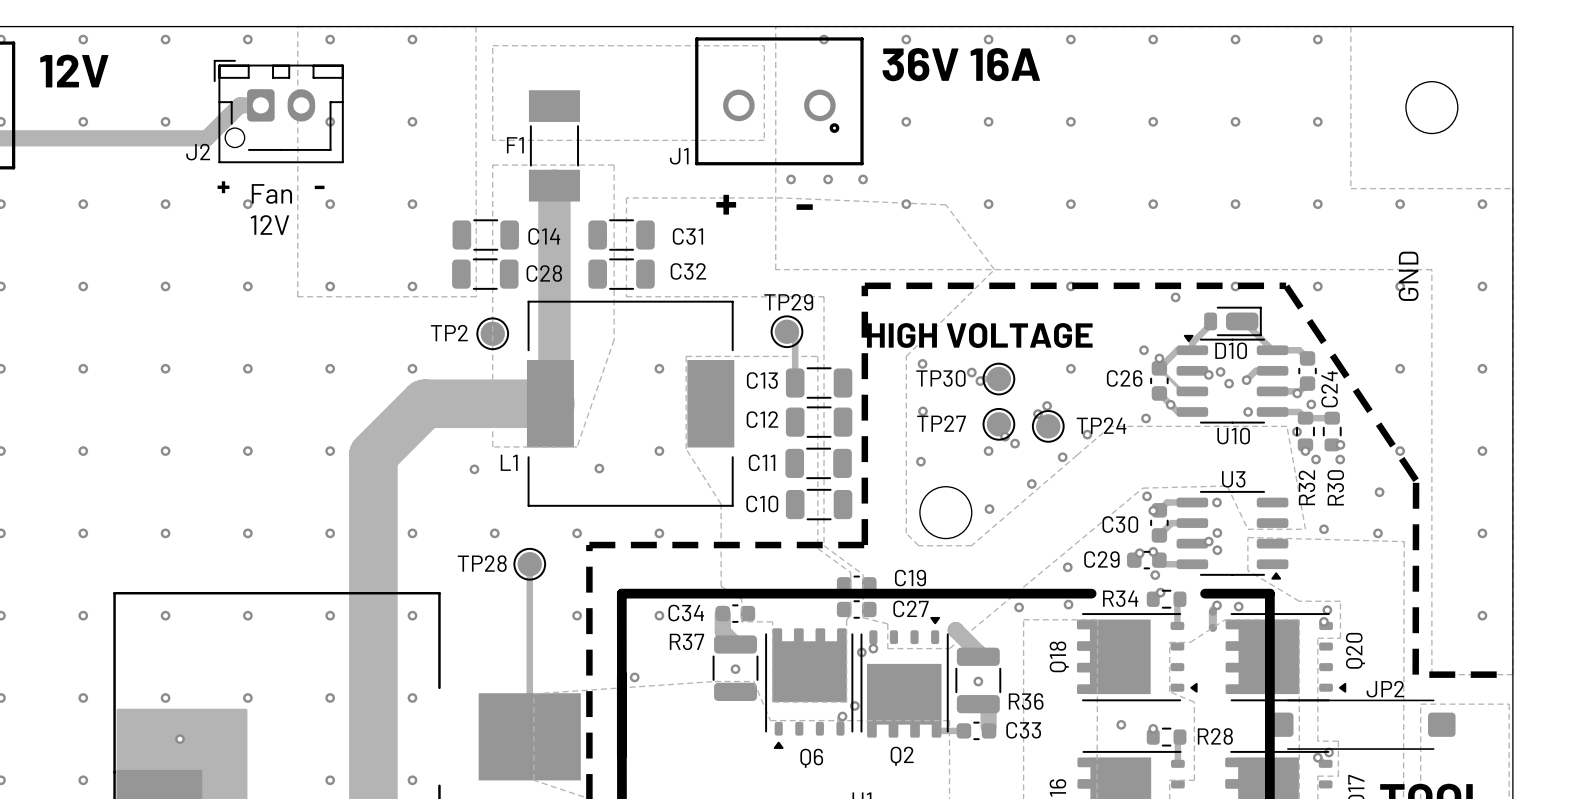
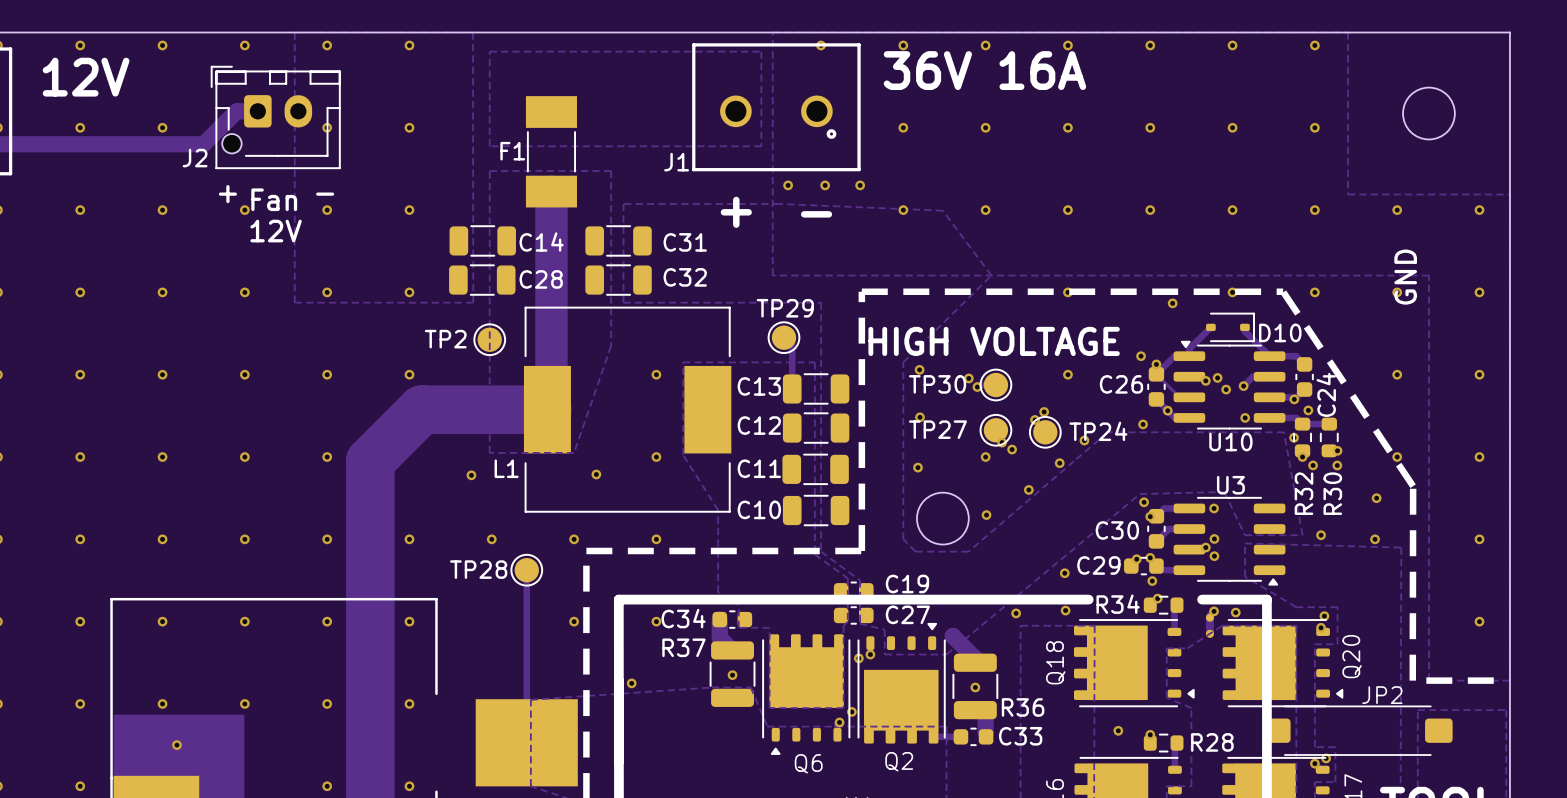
D10 footprint: [1204, 306, 1262, 337] -> [1206, 312, 1255, 343]
D10 name position: D10 (1231, 350) -> D10 (1280, 332)

